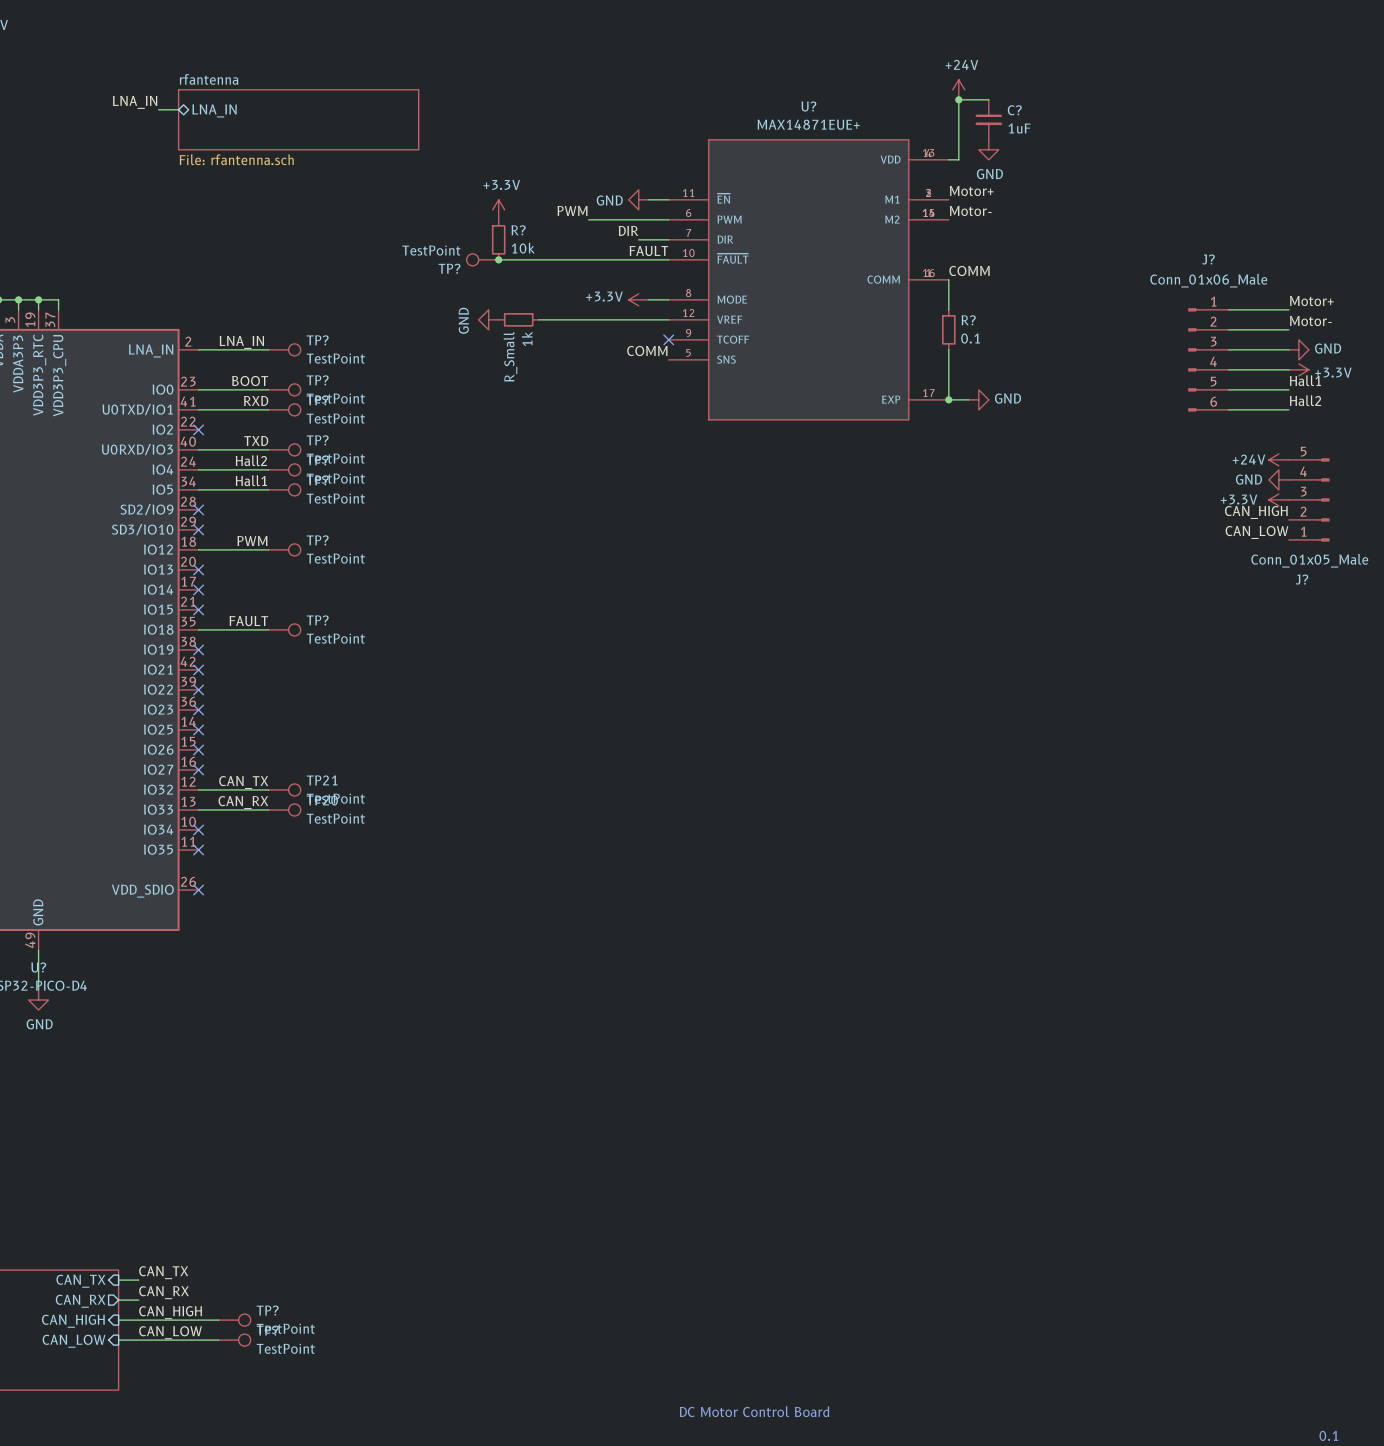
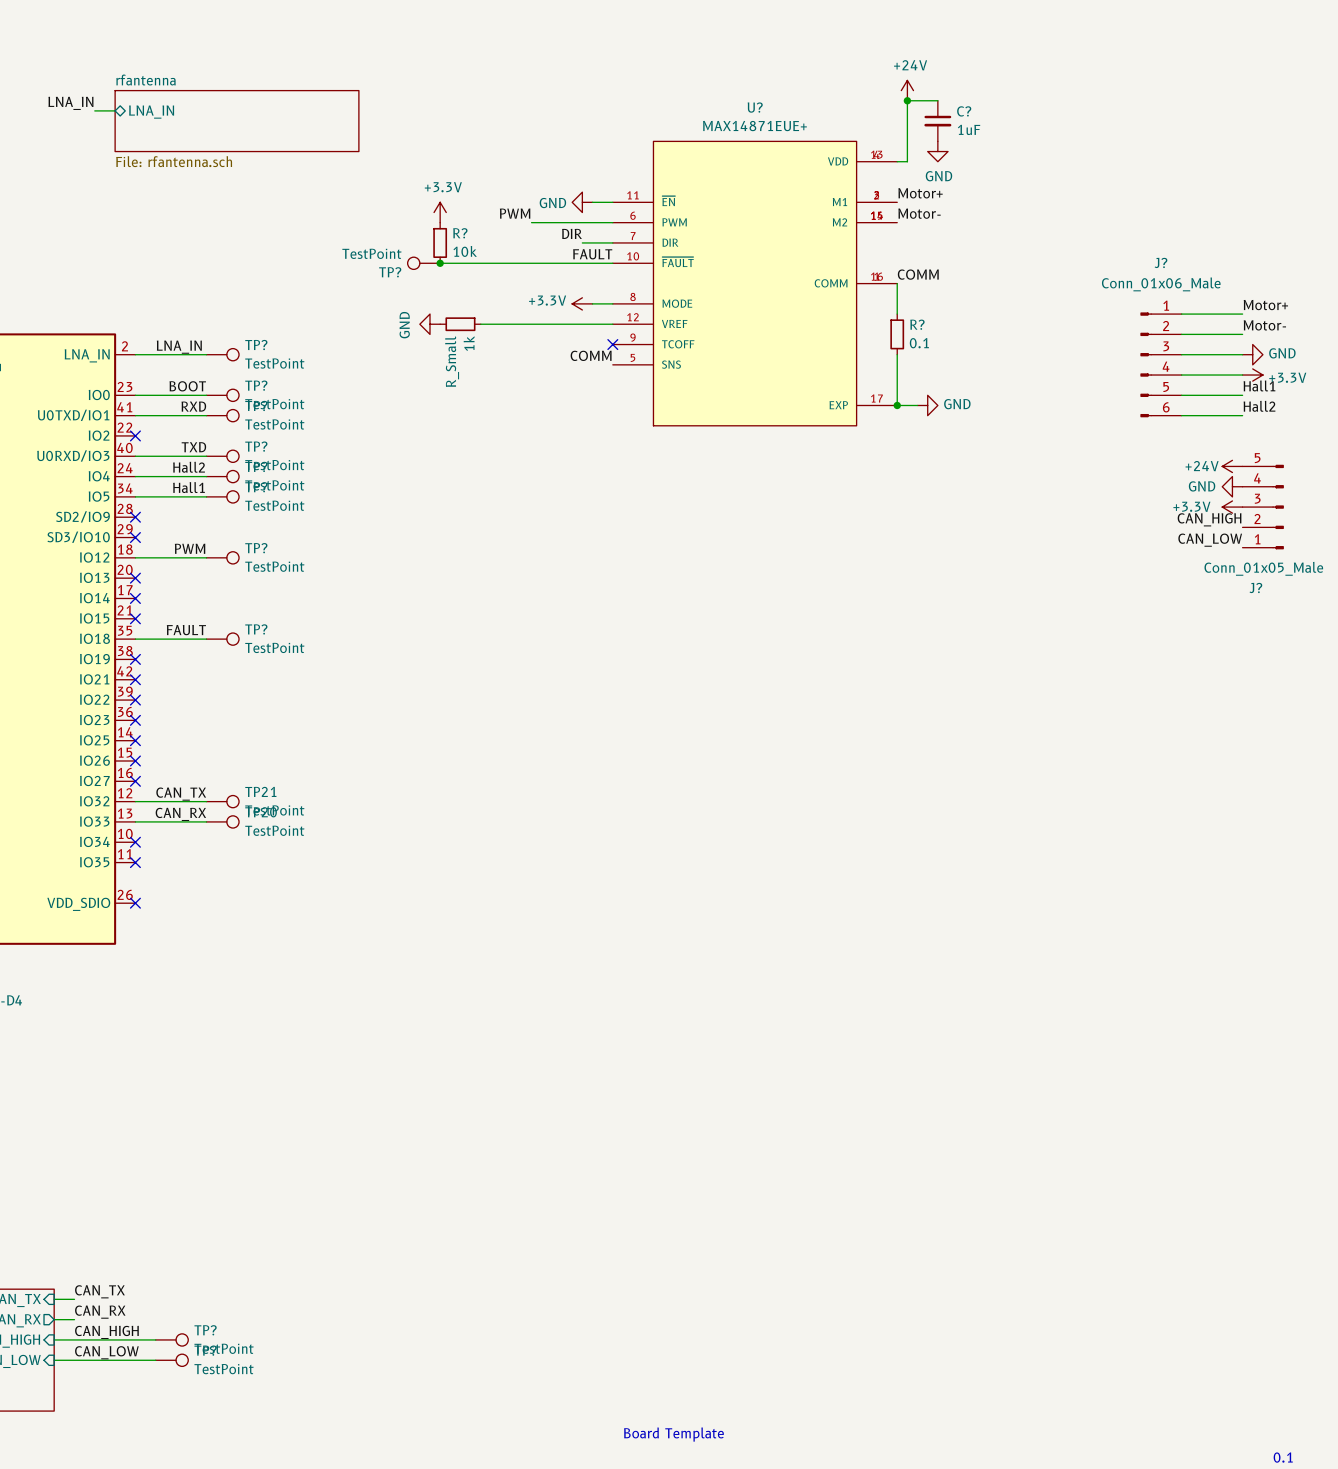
text: DC Motor Control Board (754, 1411) -> Board Template (673, 1434)

